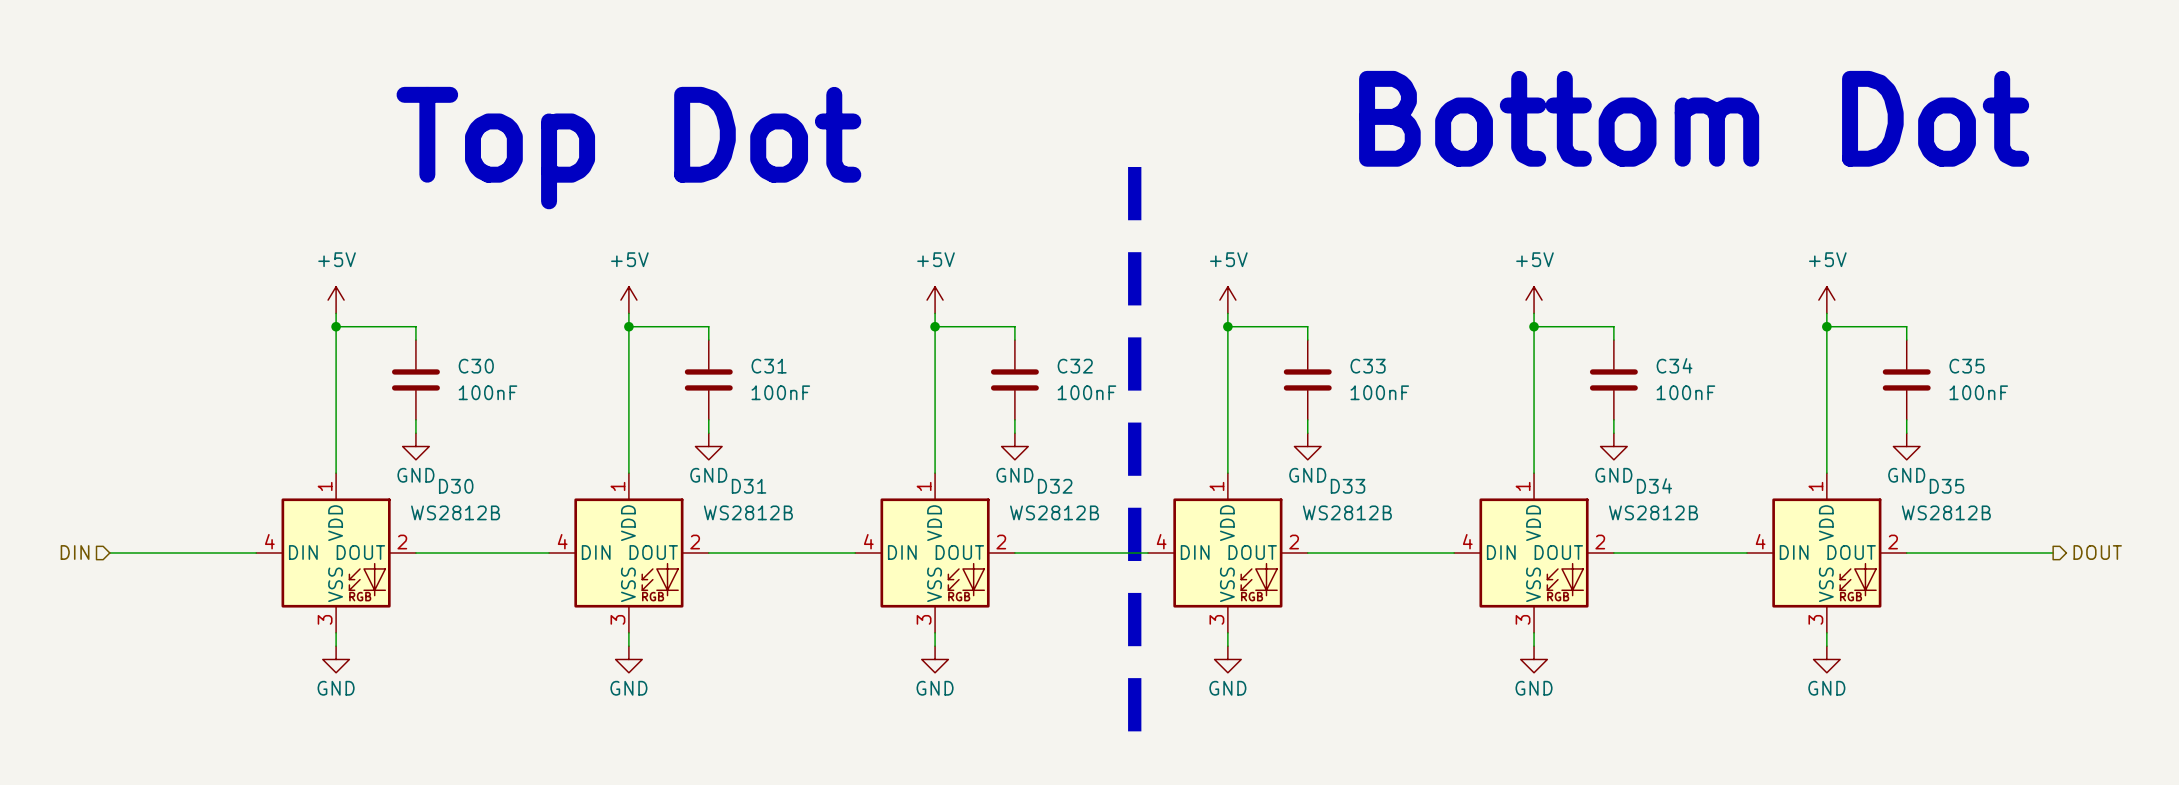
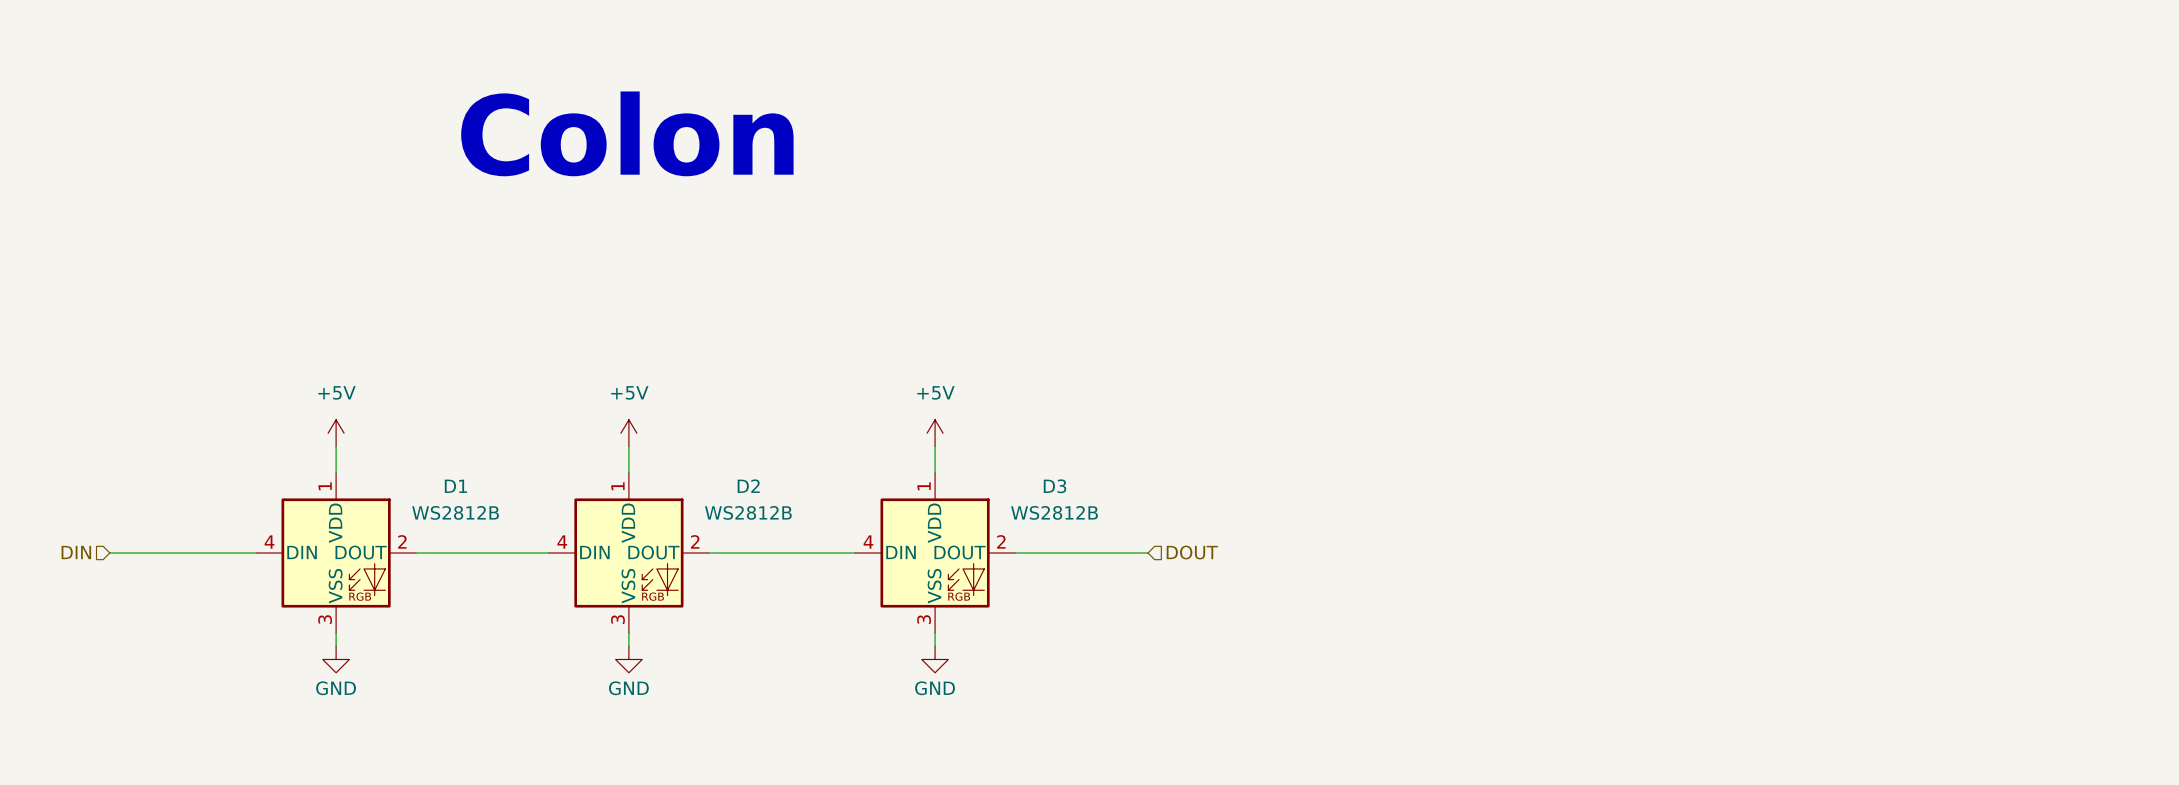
text: Bottom Dot (1694, 118) -> none
text: Top Dot (628, 148) -> Colon (627, 133)
line: (1134, 167) (1134, 739) -> none
power symbol position: +5V (336, 300) -> +5V (336, 433)
power symbol position: +5V (628, 300) -> +5V (628, 433)
power symbol position: +5V (935, 300) -> +5V (935, 433)
power symbol: +5V (1227, 300) -> none
power symbol: +5V (1534, 300) -> none
power symbol: +5V (1826, 300) -> none
wire: (336, 313) (336, 446) -> none
wire: (628, 313) (628, 446) -> none
wire: (935, 313) (935, 446) -> none
wire: (1227, 313) (1227, 473) -> none
wire: (1534, 313) (1534, 473) -> none
wire: (1826, 313) (1826, 473) -> none
wire: (336, 326) (415, 326) (415, 340) -> none
junction: (336, 326) -> none
wire: (628, 326) (708, 326) (708, 340) -> none
junction: (628, 326) -> none
wire: (935, 326) (1014, 326) (1014, 340) -> none
junction: (935, 326) -> none
wire: (1227, 326) (1307, 326) (1307, 340) -> none
junction: (1227, 326) -> none
wire: (1534, 326) (1613, 326) (1613, 340) -> none
junction: (1534, 326) -> none
wire: (1826, 326) (1906, 326) (1906, 340) -> none
junction: (1826, 326) -> none
C30: 100nF (415, 379) -> none
C31: 100nF (708, 379) -> none
C32: 100nF (1014, 379) -> none
C33: 100nF (1307, 379) -> none
C34: 100nF (1613, 379) -> none
C35: 100nF (1906, 379) -> none
wire: (415, 419) (415, 433) -> none
wire: (708, 419) (708, 433) -> none
wire: (1014, 419) (1014, 433) -> none
wire: (1307, 419) (1307, 433) -> none
wire: (1613, 419) (1613, 433) -> none
wire: (1906, 419) (1906, 433) -> none
power symbol: GND (415, 446) -> none
power symbol: GND (708, 446) -> none
power symbol: GND (1014, 446) -> none
power symbol: GND (1307, 446) -> none
power symbol: GND (1613, 446) -> none
power symbol: GND (1906, 446) -> none
D30 name: D30 (456, 486) -> D1 (455, 486)
D31 name: D31 (749, 486) -> D2 (748, 486)
D32 name: D32 (1055, 486) -> D3 (1055, 486)
hierarchical label: none -> DOUT (1192, 552)
hierarchical label: DOUT (2097, 552) -> none
D33: WS2812B (1227, 553) -> none
wire: (1307, 553) (1454, 553) -> none
D34: WS2812B (1534, 553) -> none
wire: (1613, 553) (1746, 553) -> none
D35: WS2812B (1826, 553) -> none
wire: (1906, 553) (2053, 553) -> none
wire: (1227, 632) (1227, 646) -> none
wire: (1534, 632) (1534, 646) -> none
wire: (1826, 632) (1826, 646) -> none
power symbol: GND (1227, 659) -> none
power symbol: GND (1534, 659) -> none
power symbol: GND (1826, 659) -> none

